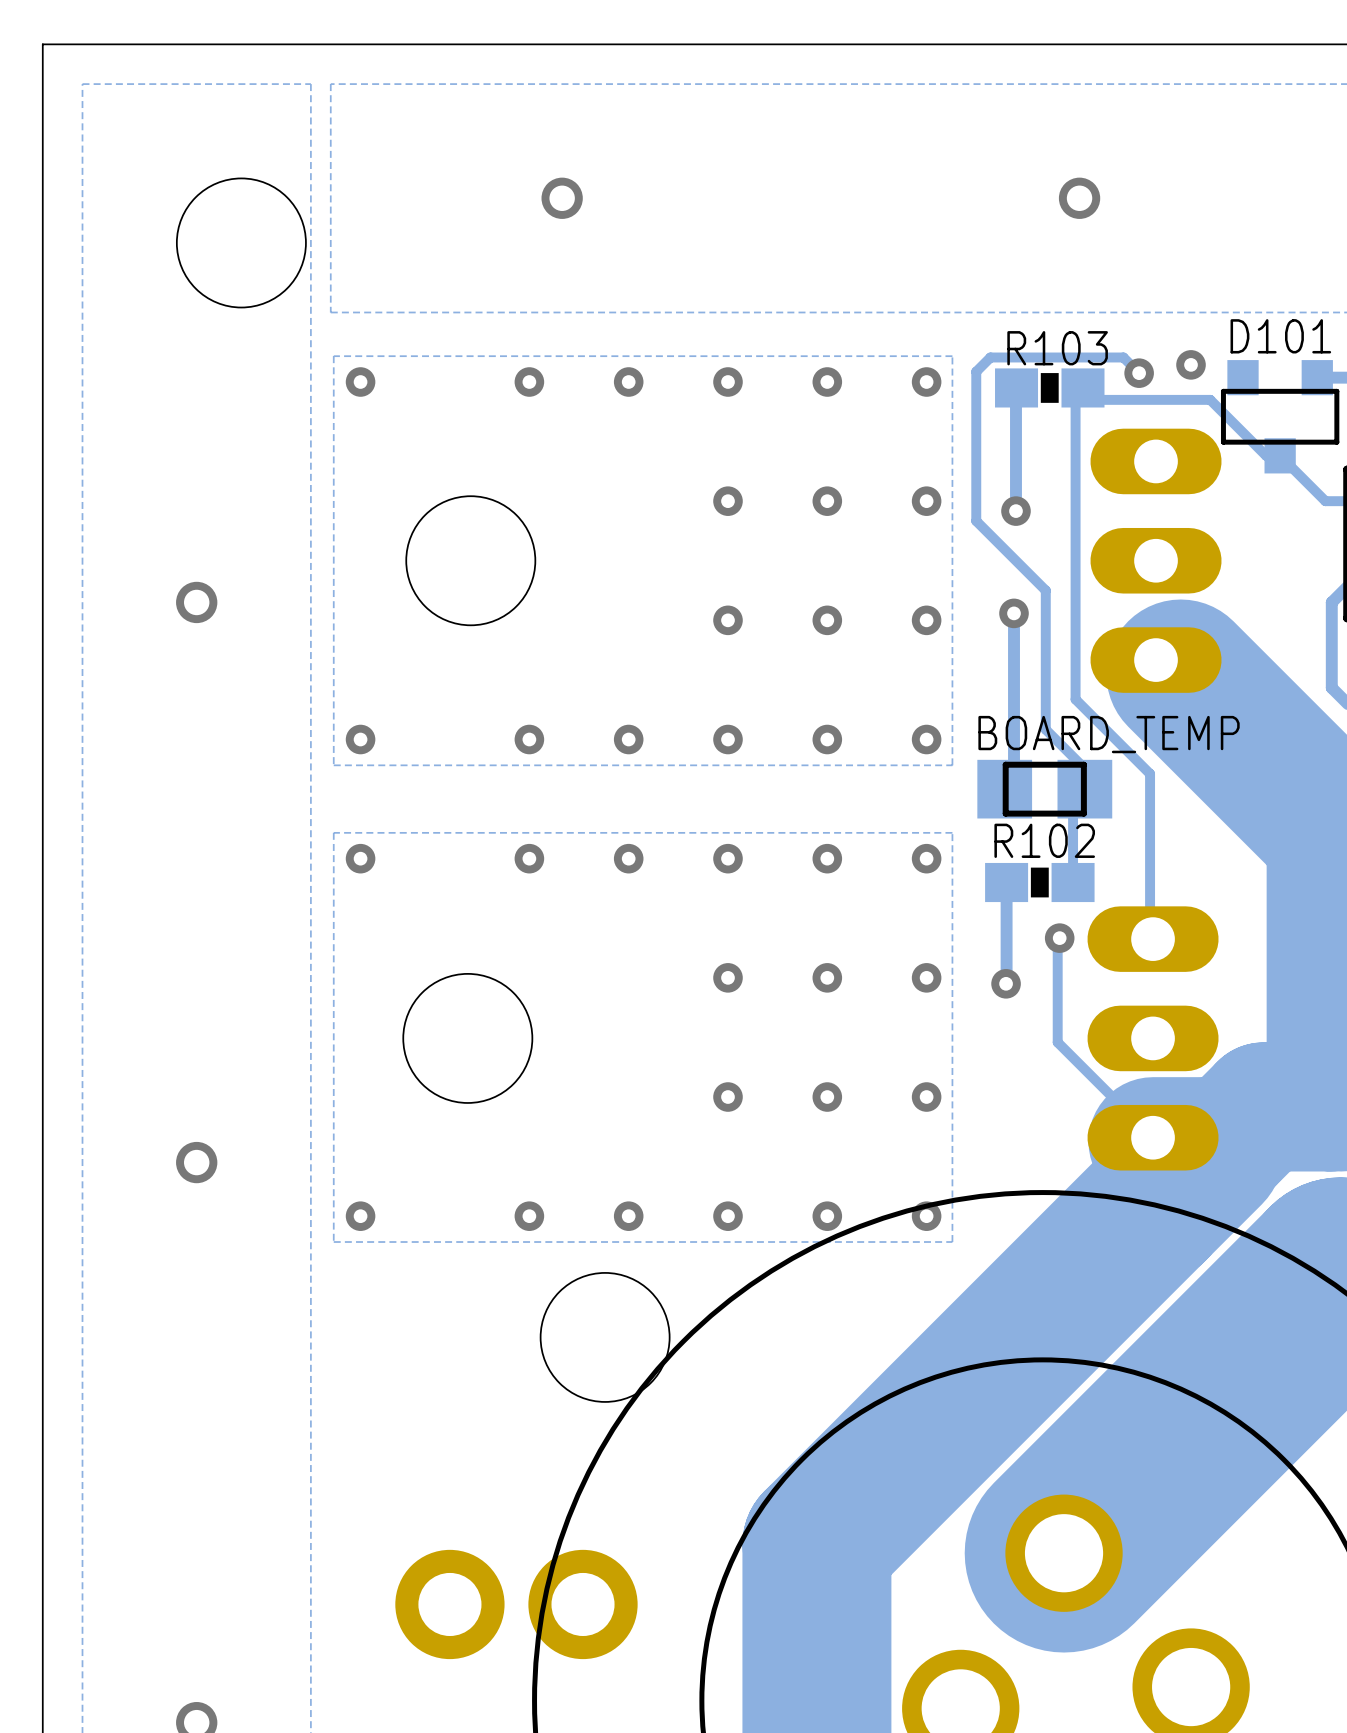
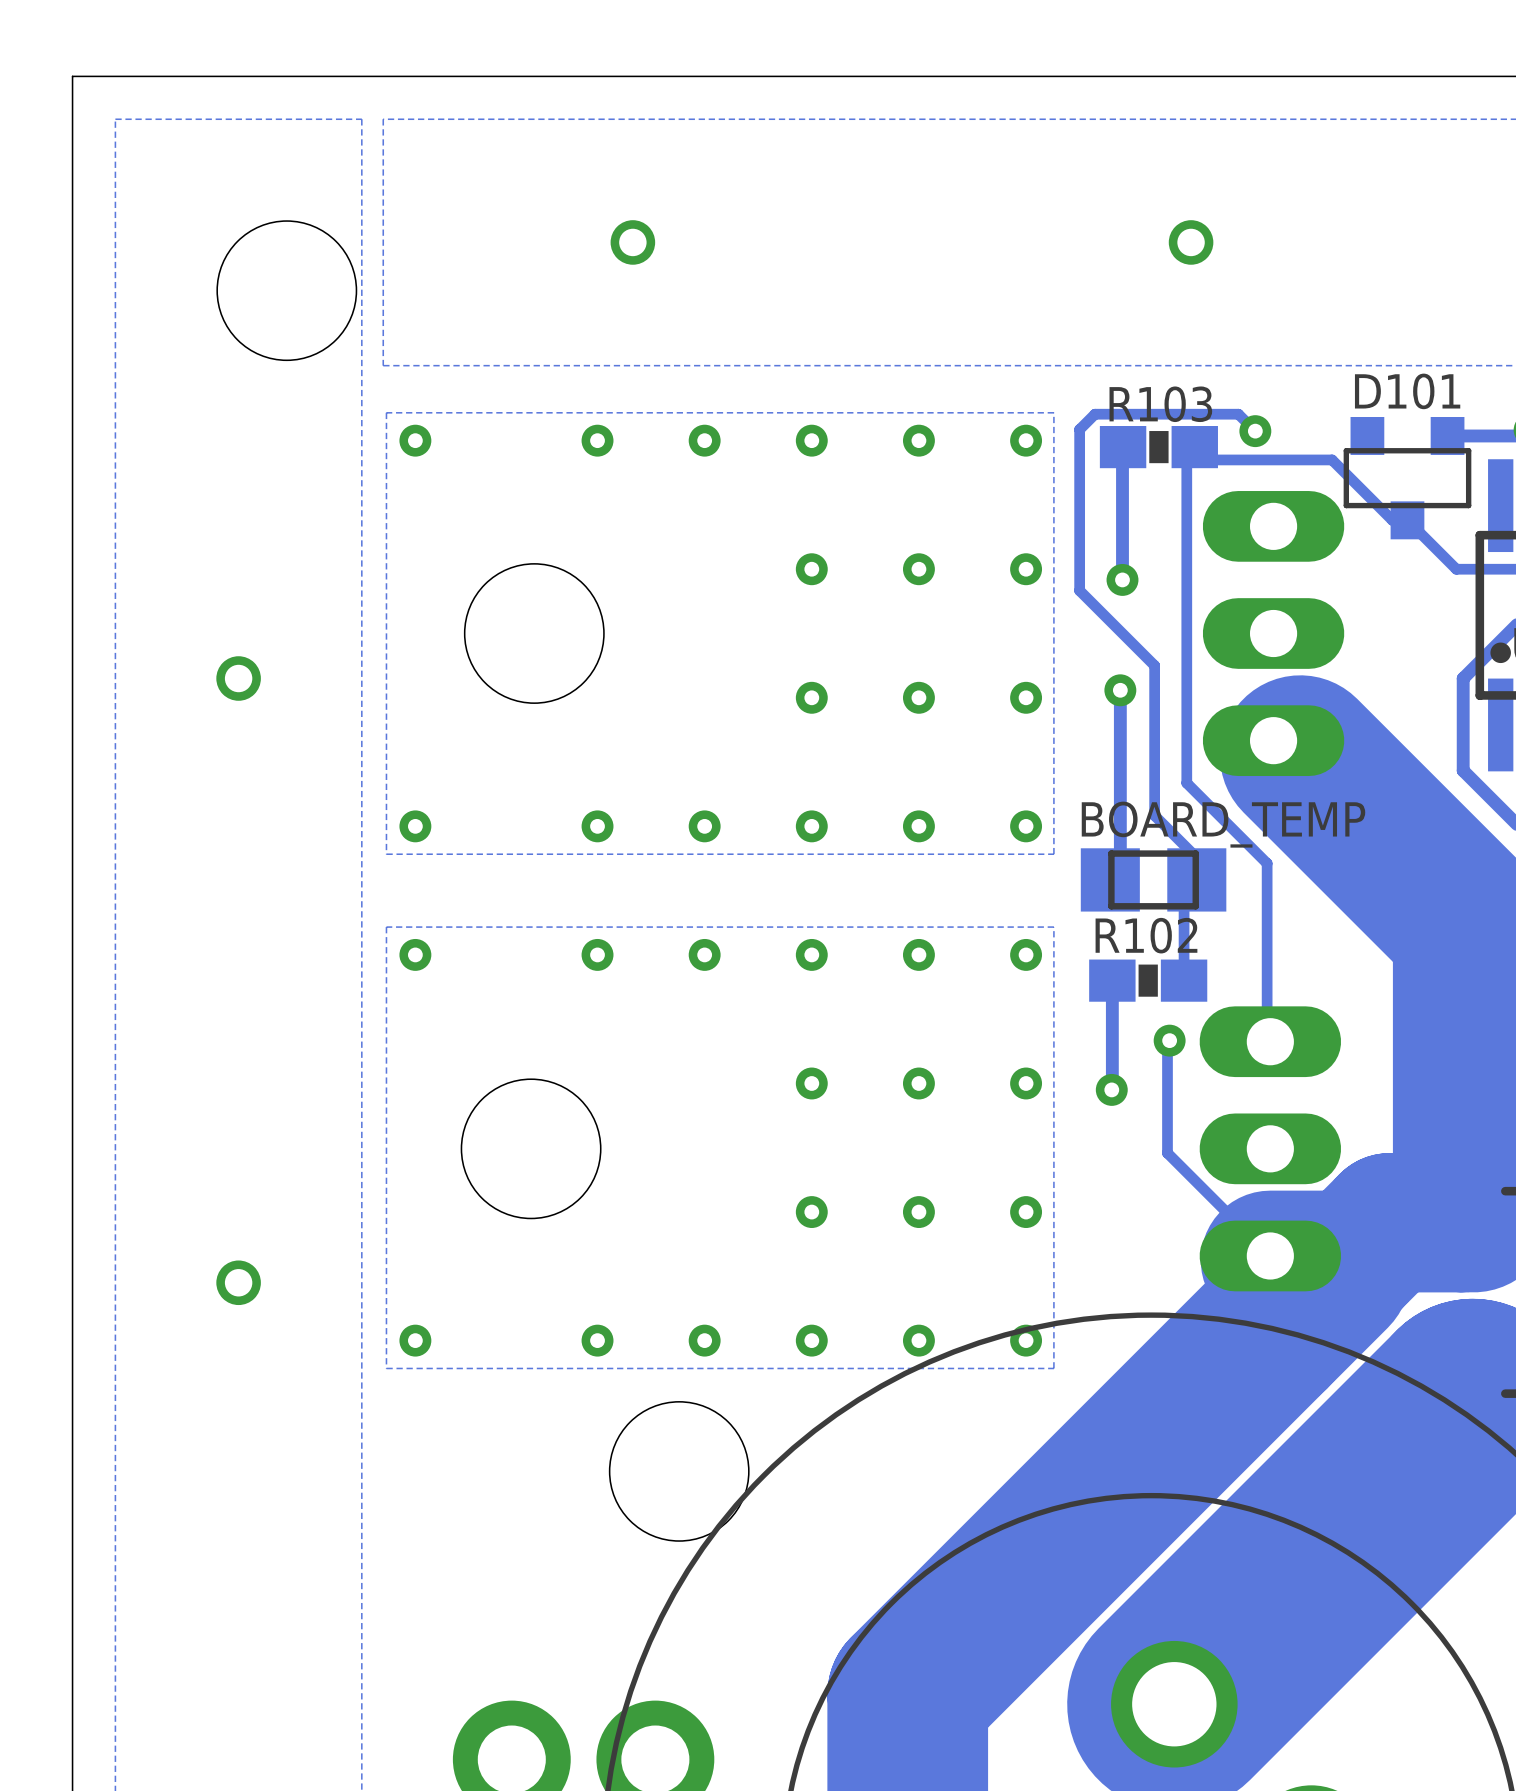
via: (1191, 364) -> none

